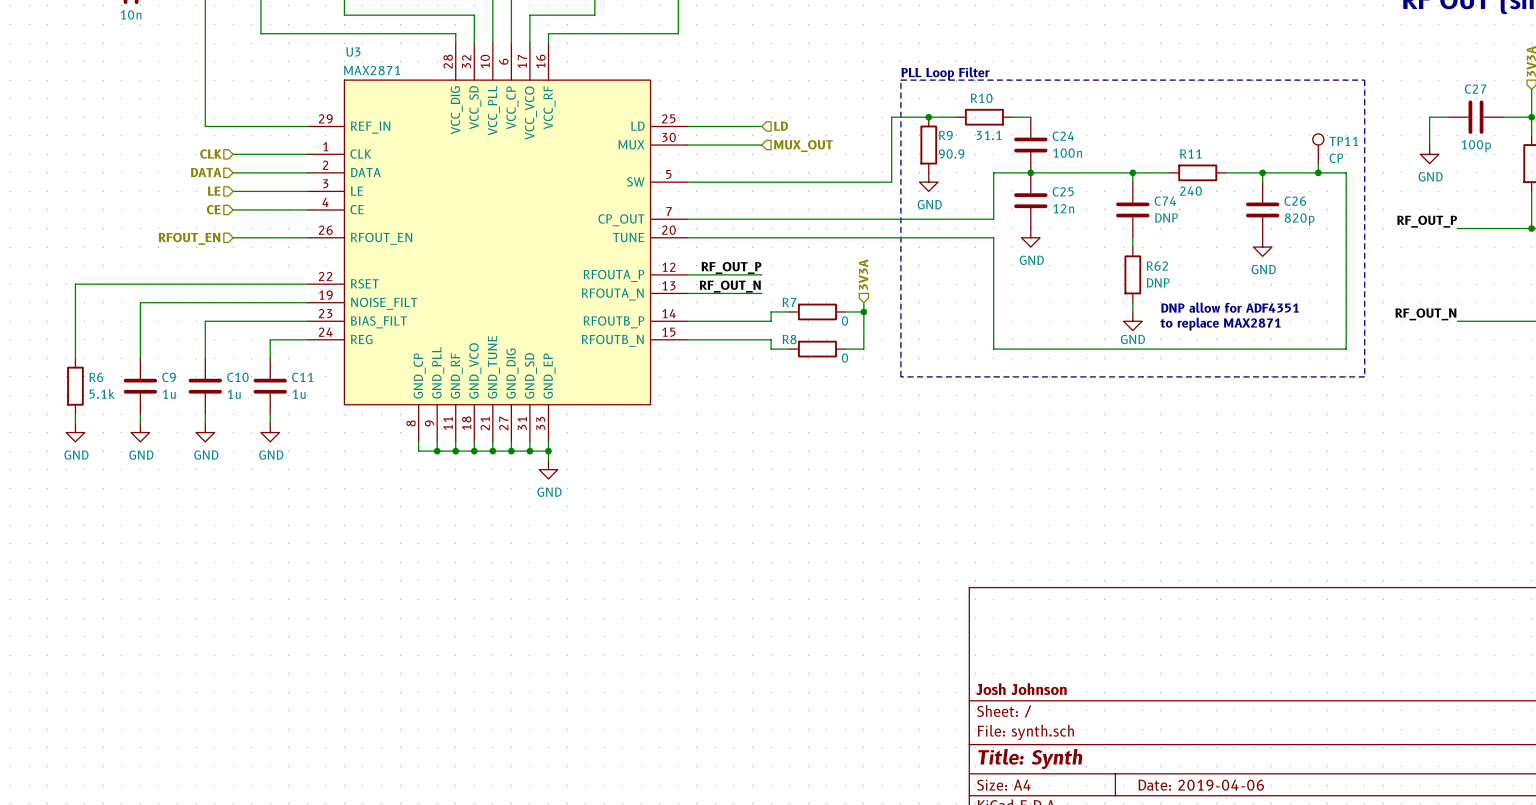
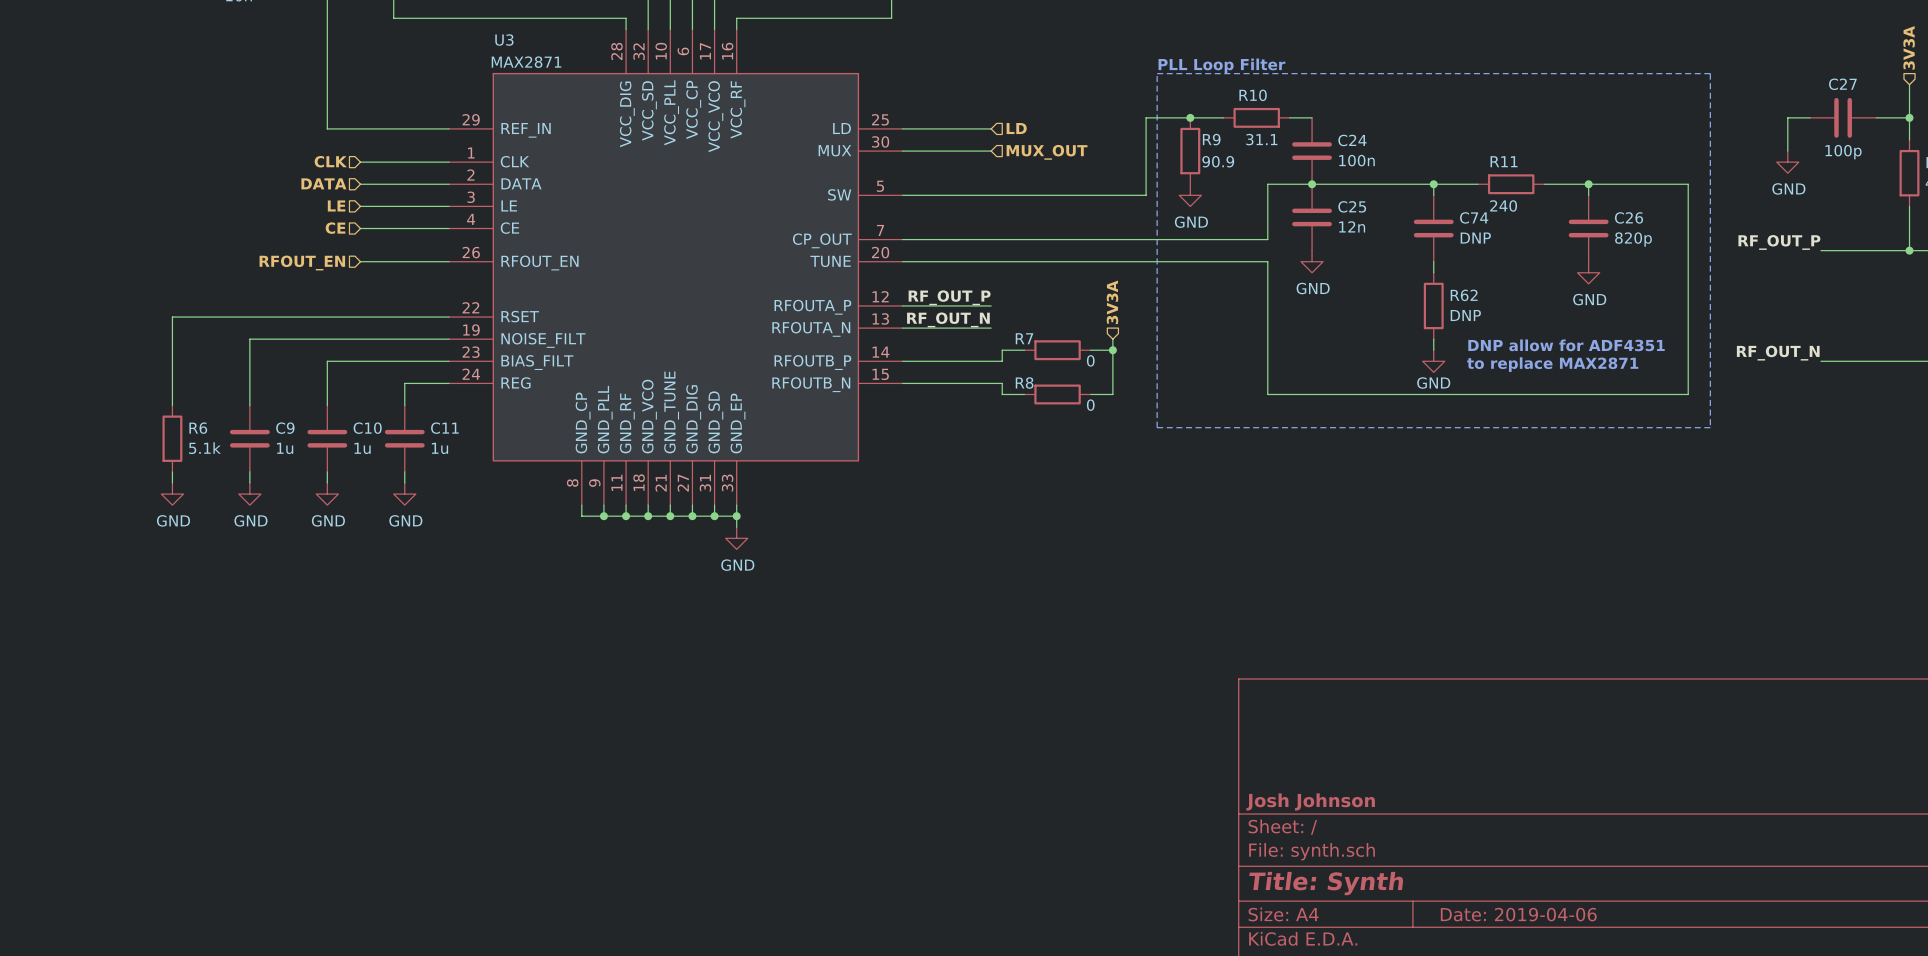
TP11: CP (1318, 148) -> none
wire: (1318, 163) (1318, 172) -> none
junction: (1318, 172) -> none

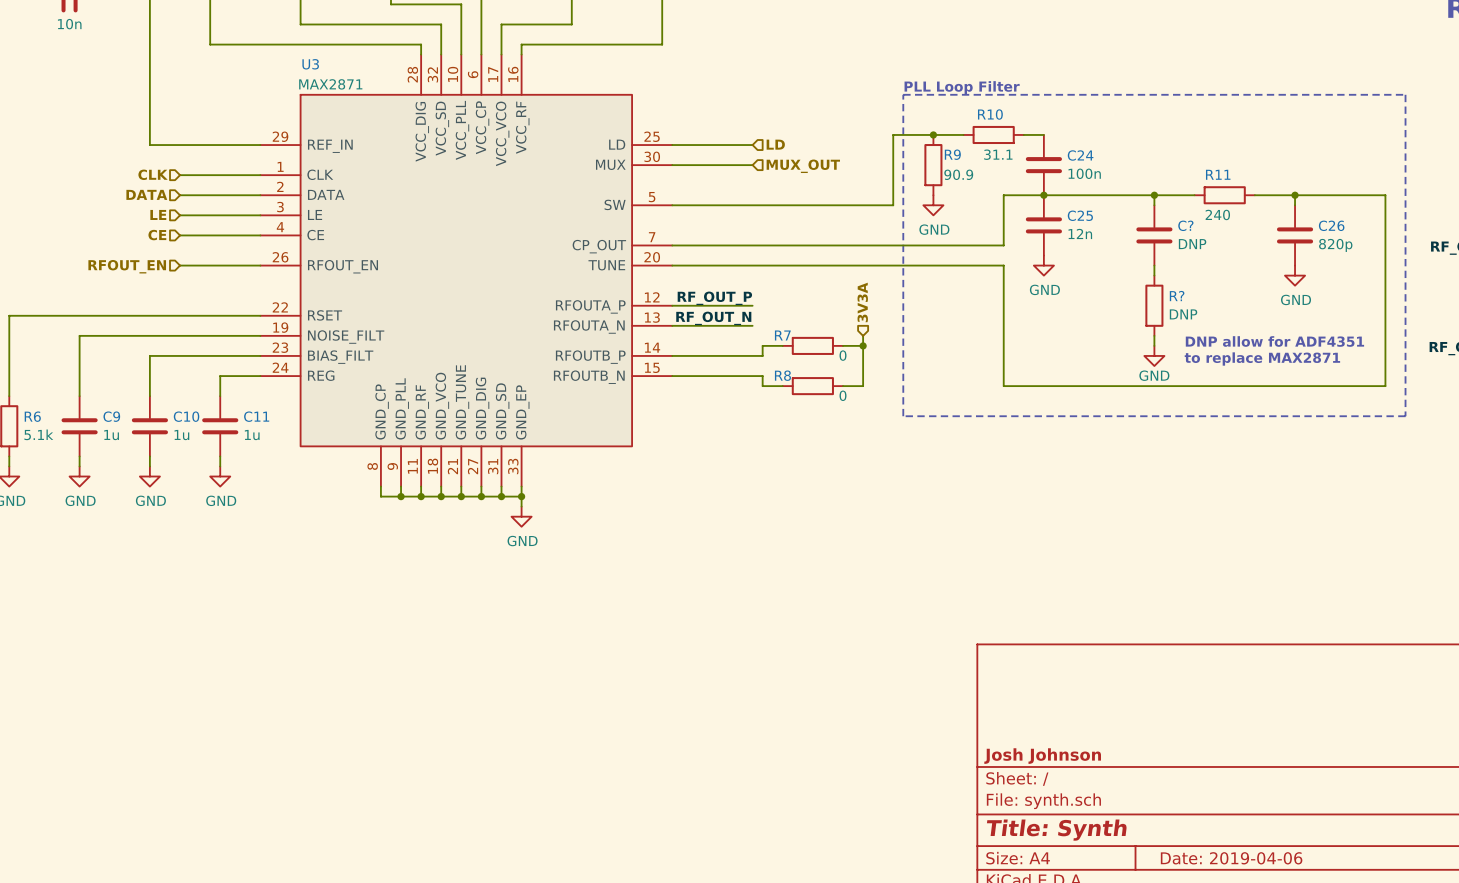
C74 name: C74 (1474, 217) -> C? (1185, 225)
R62 name: R62 (1464, 295) -> R? (1177, 296)

